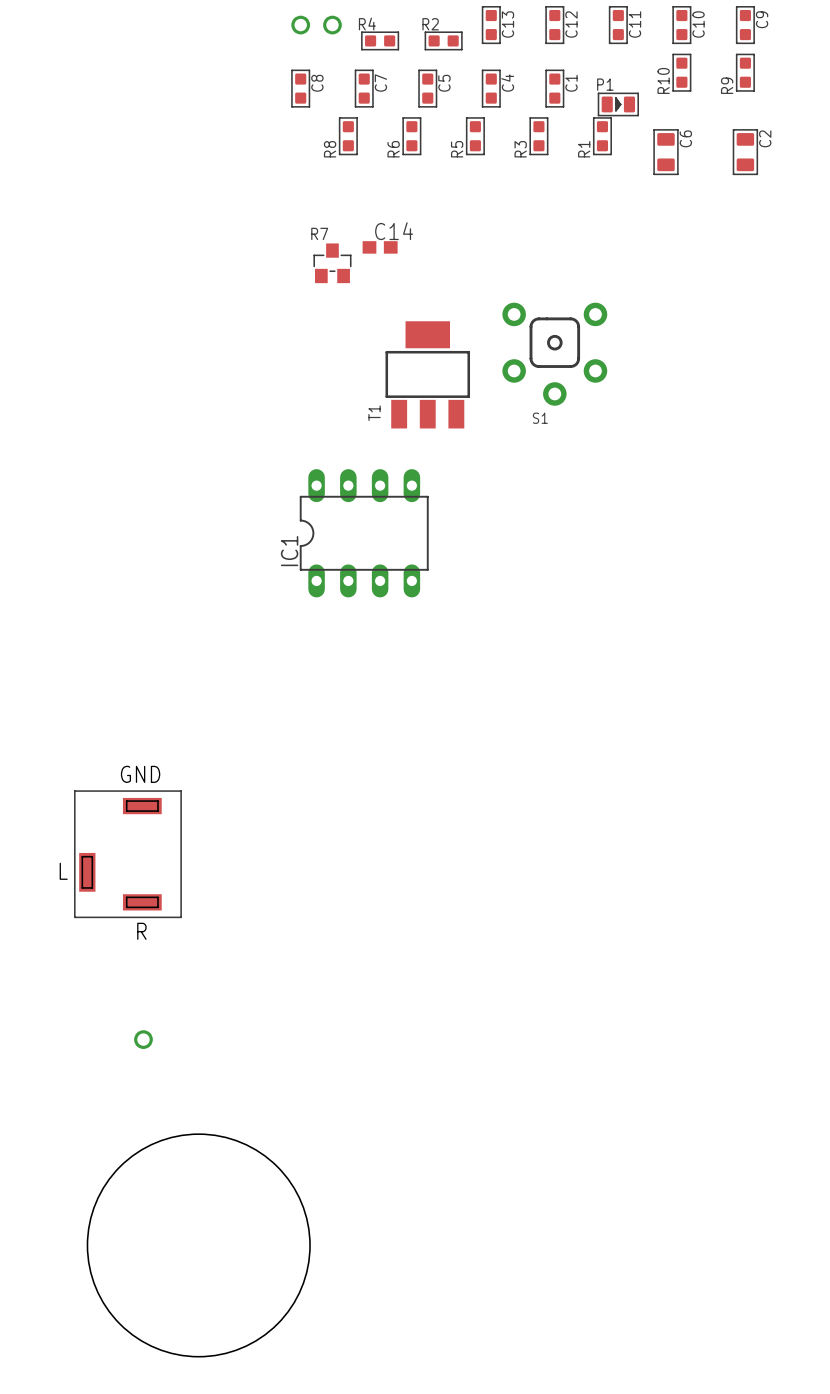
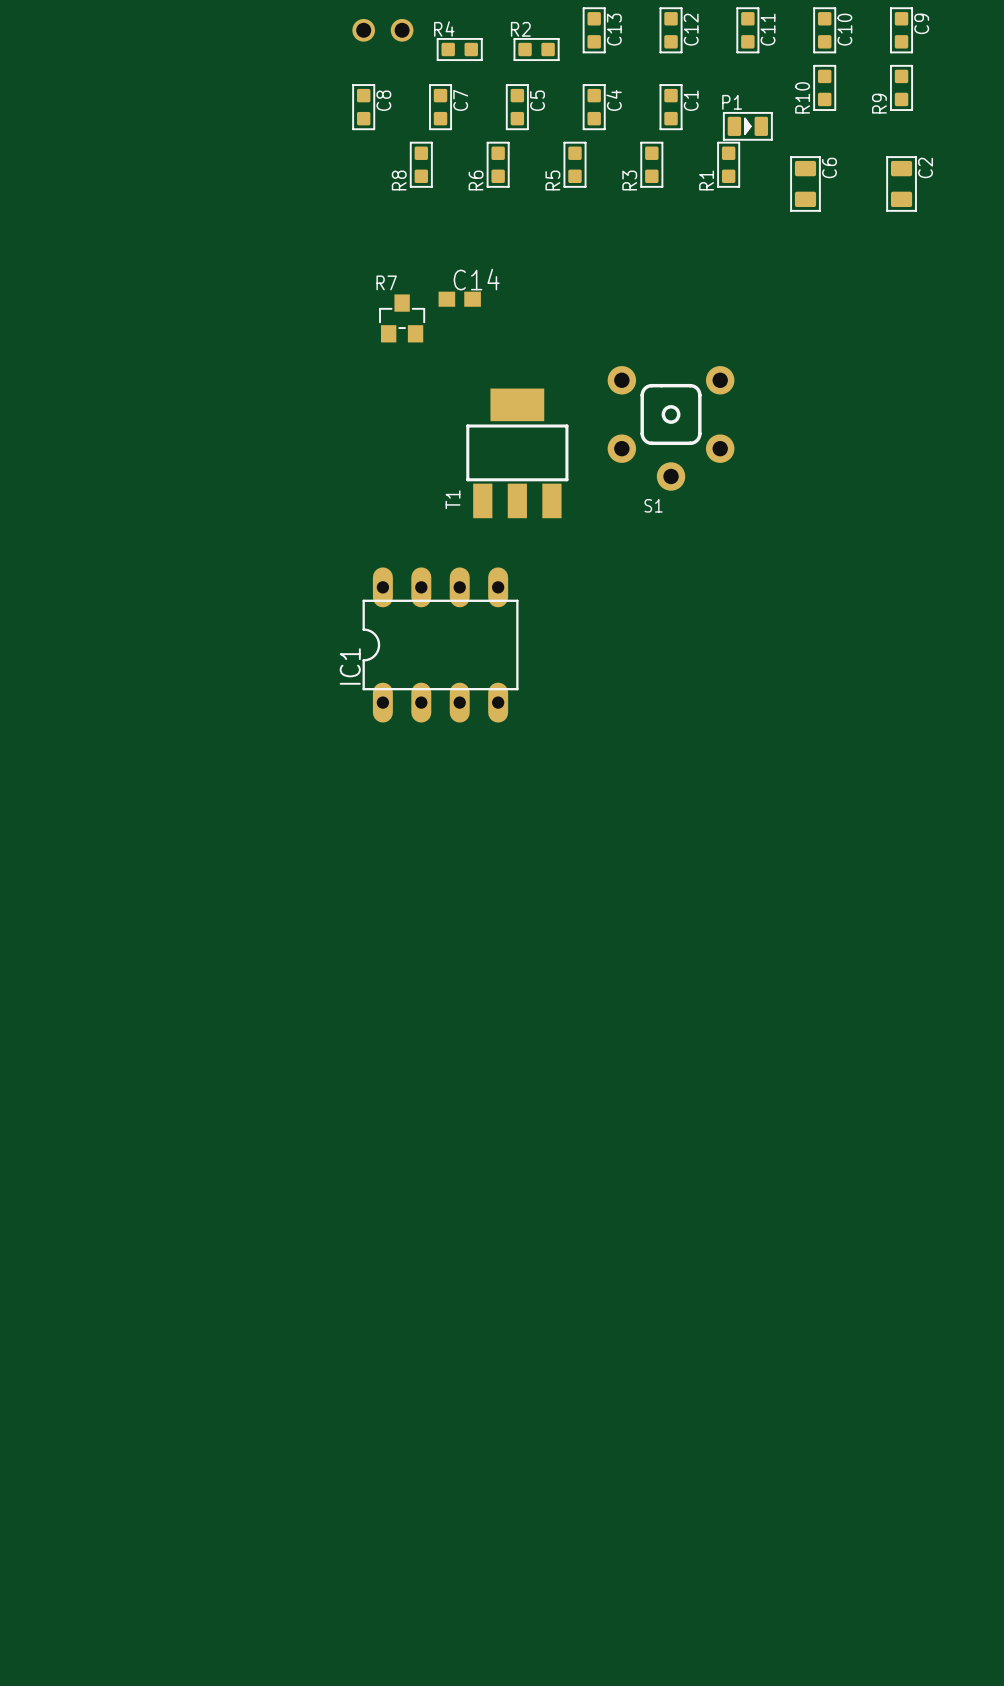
part: (127, 854) -> none
part: (143, 1039) -> none
part: (198, 1245) -> none

